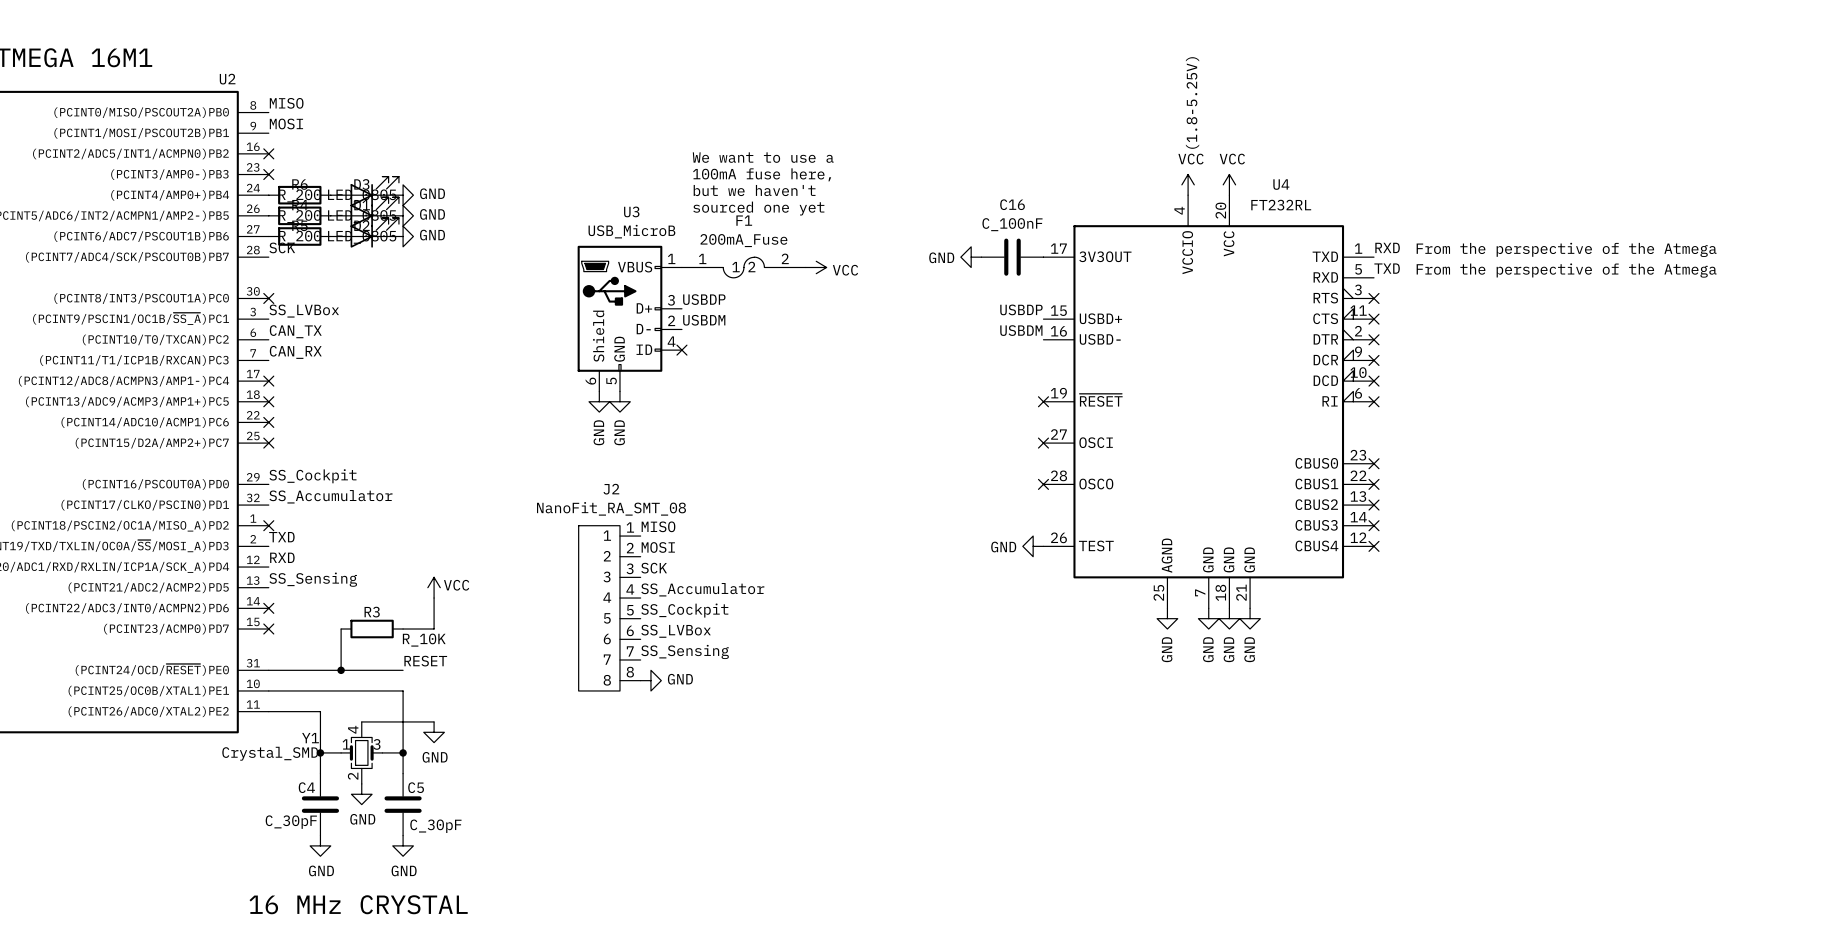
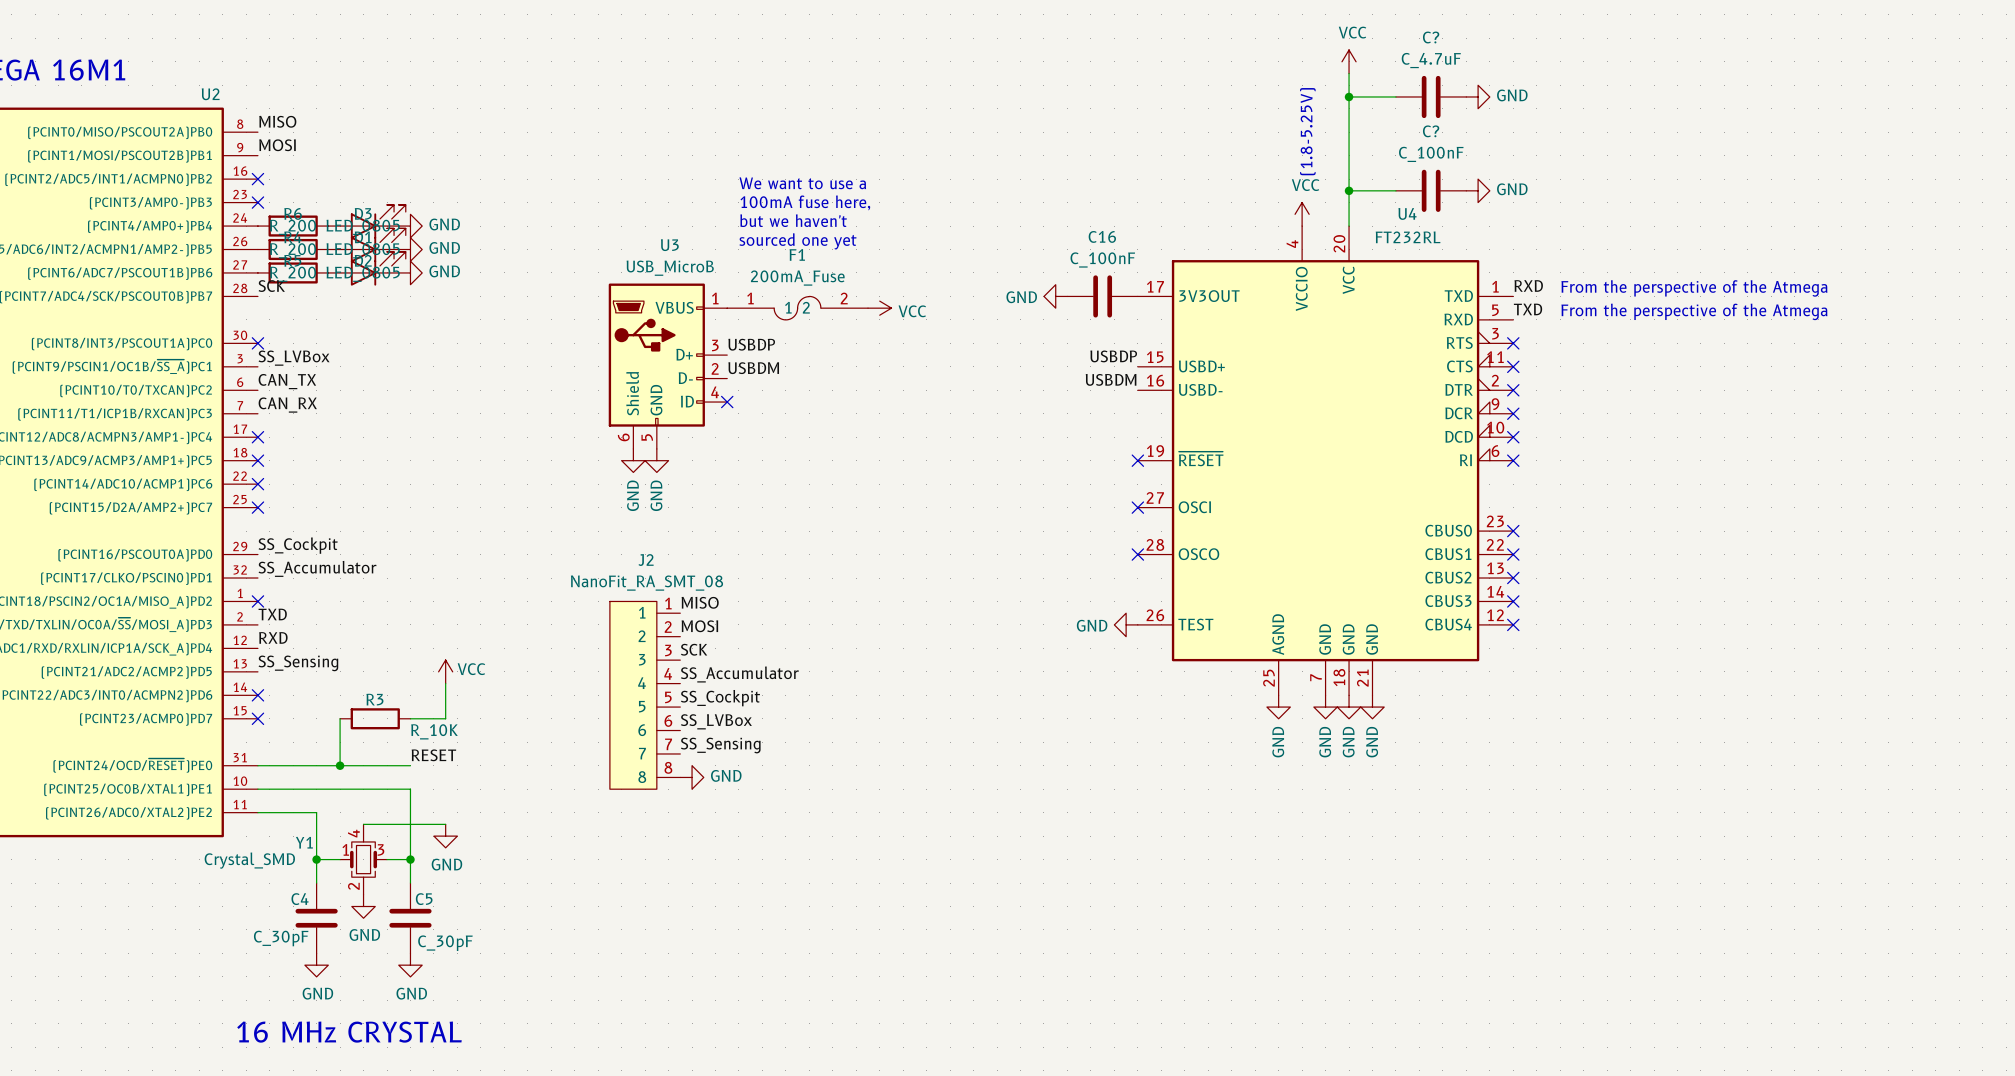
wire: none -> (1349, 73) (1349, 226)
wire: none -> (1349, 96) (1395, 96)
junction: none -> (1349, 96)
C?: none -> C_4.7uF (1431, 96)
power symbol: none -> GND (1478, 96)
wire: none -> (1349, 190) (1395, 190)
junction: none -> (1349, 190)
C?: none -> C_100nF (1431, 190)
power symbol: none -> GND (1478, 190)
power symbol position: VCC (1229, 184) -> VCC (1349, 61)

